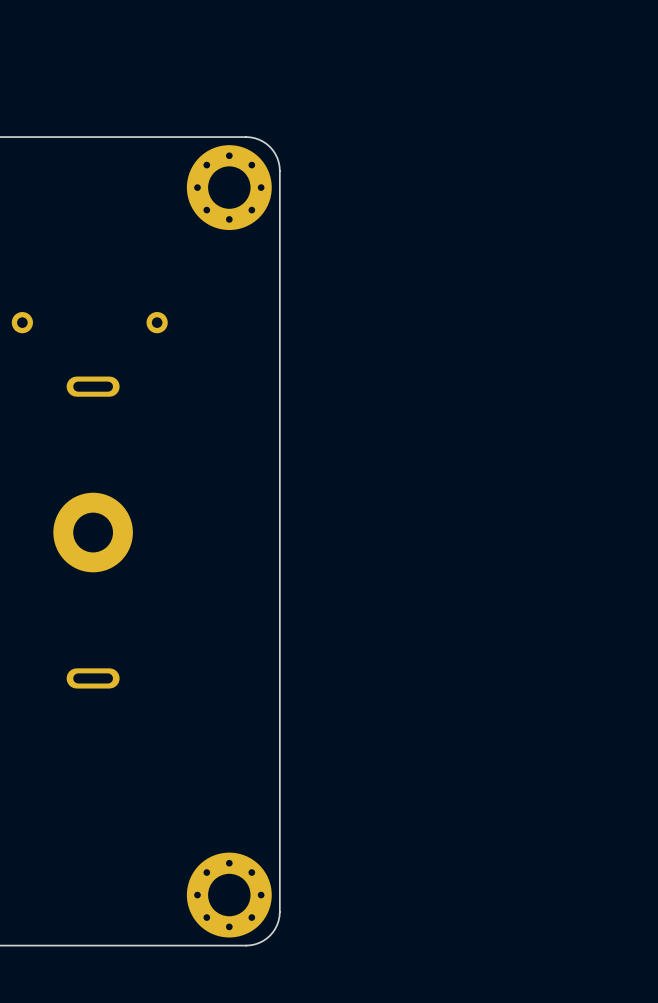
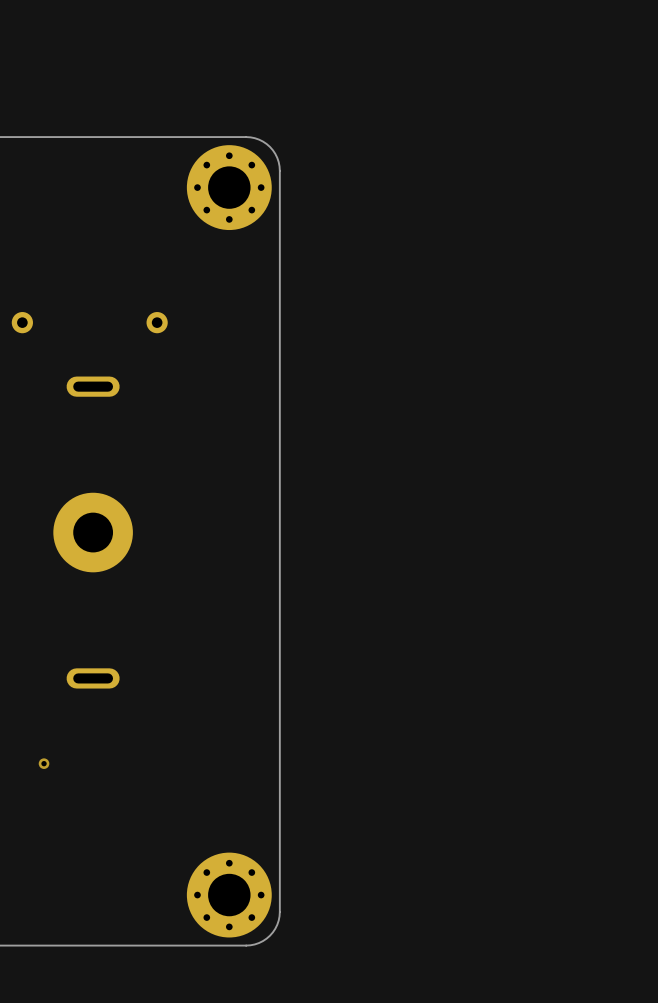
via: none -> (44, 763)

